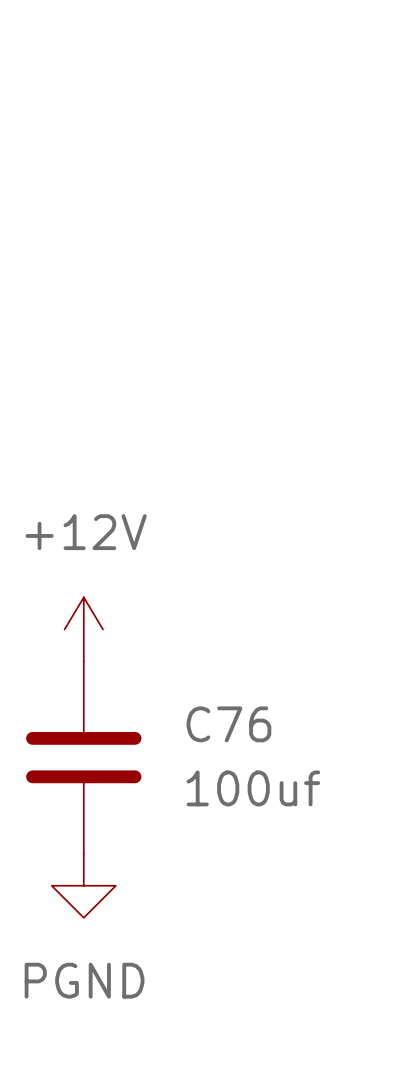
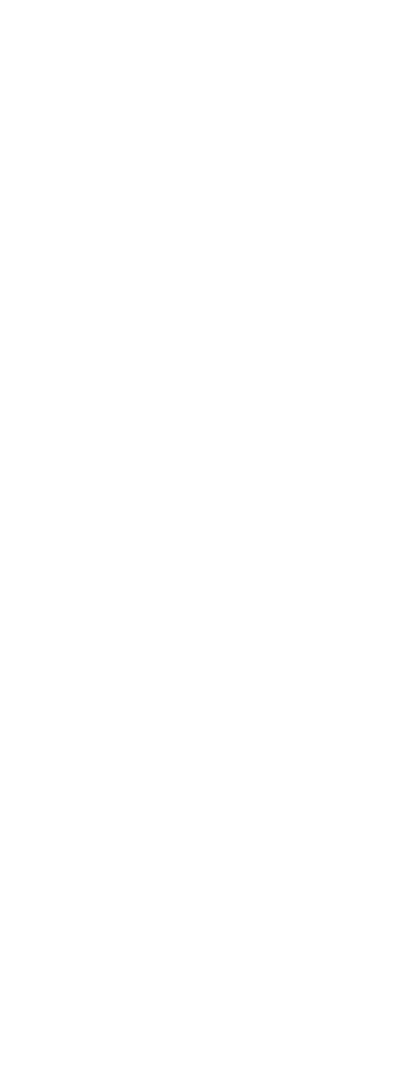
power symbol: +12V (83, 629) -> none
C76: 100uf (83, 757) -> none
power symbol: PGND (83, 885) -> none

